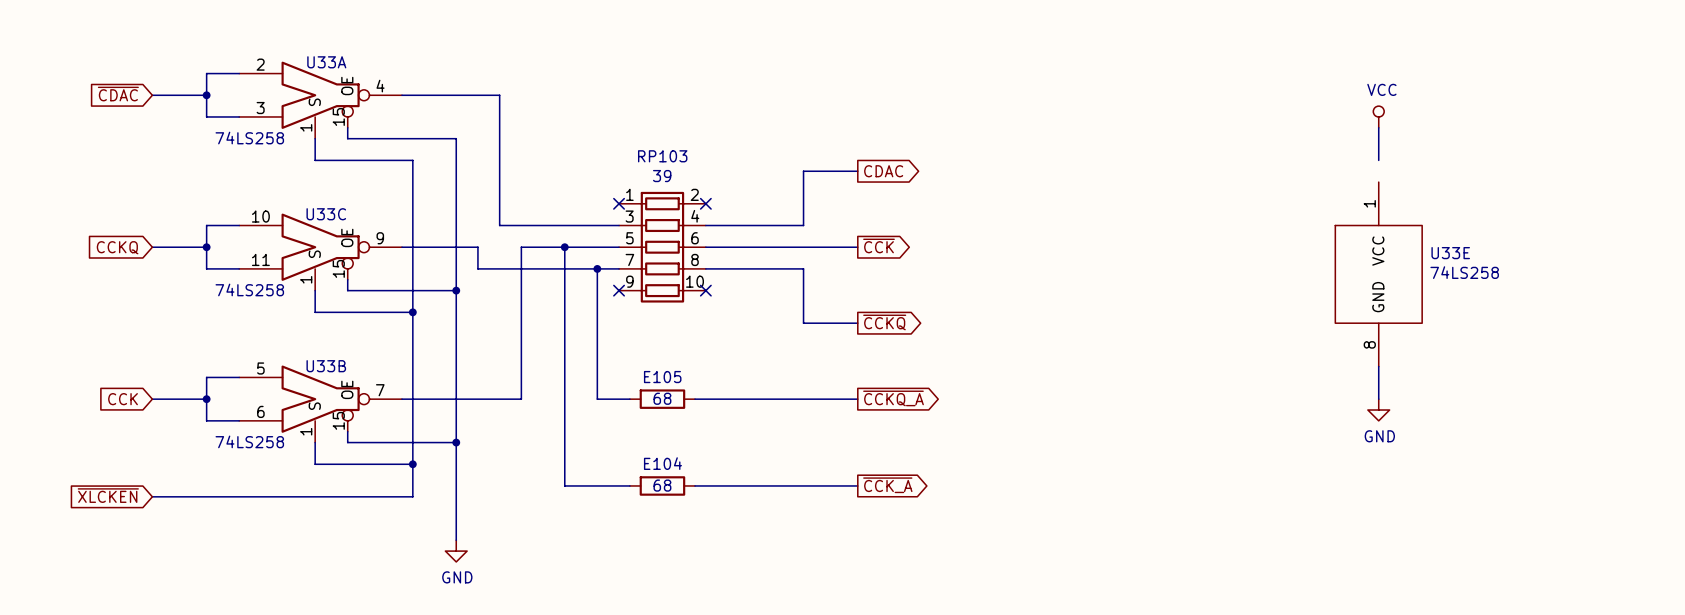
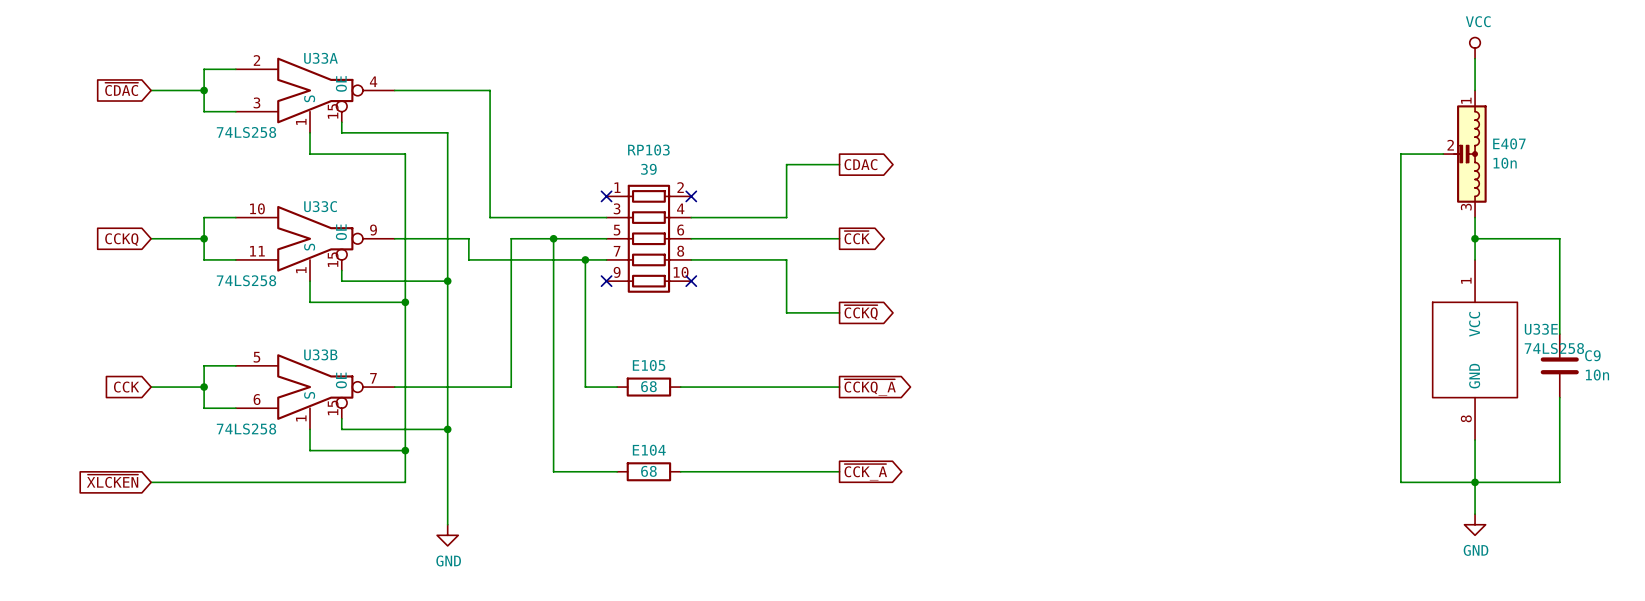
power symbol position: VCC (1378, 116) -> VCC (1475, 48)
wire: (1378, 127) (1378, 160) -> (1475, 58) (1475, 90)
wire: none -> (1443, 154) (1400, 154) (1400, 482) (1559, 482) (1559, 397)
E407: none -> 10n (1464, 154)
wire: none -> (1475, 217) (1475, 259)
wire: none -> (1475, 238) (1559, 238) (1559, 334)
junction: none -> (1475, 238)
U33E position: (1378, 274) -> (1475, 349)
wire: (1378, 366) (1378, 399) -> none
C9: none -> 10n (1559, 365)
power symbol position: GND (1378, 410) -> GND (1475, 524)
wire: none -> (1475, 440) (1475, 514)
junction: none -> (1475, 482)

